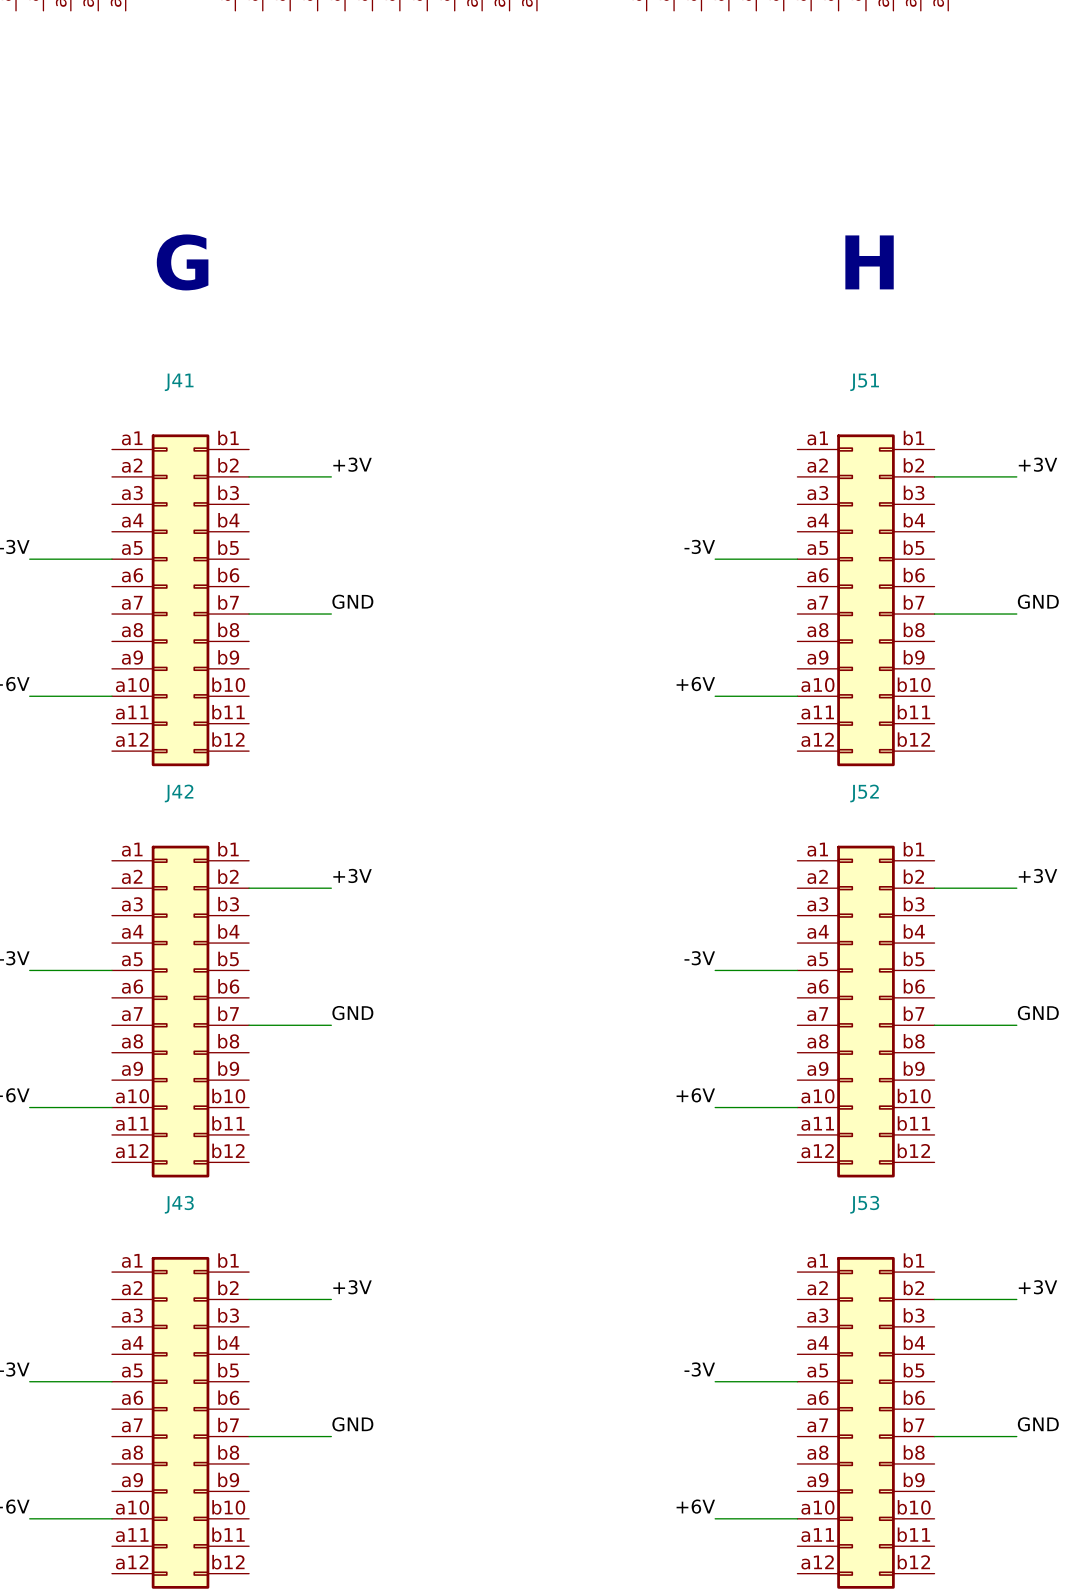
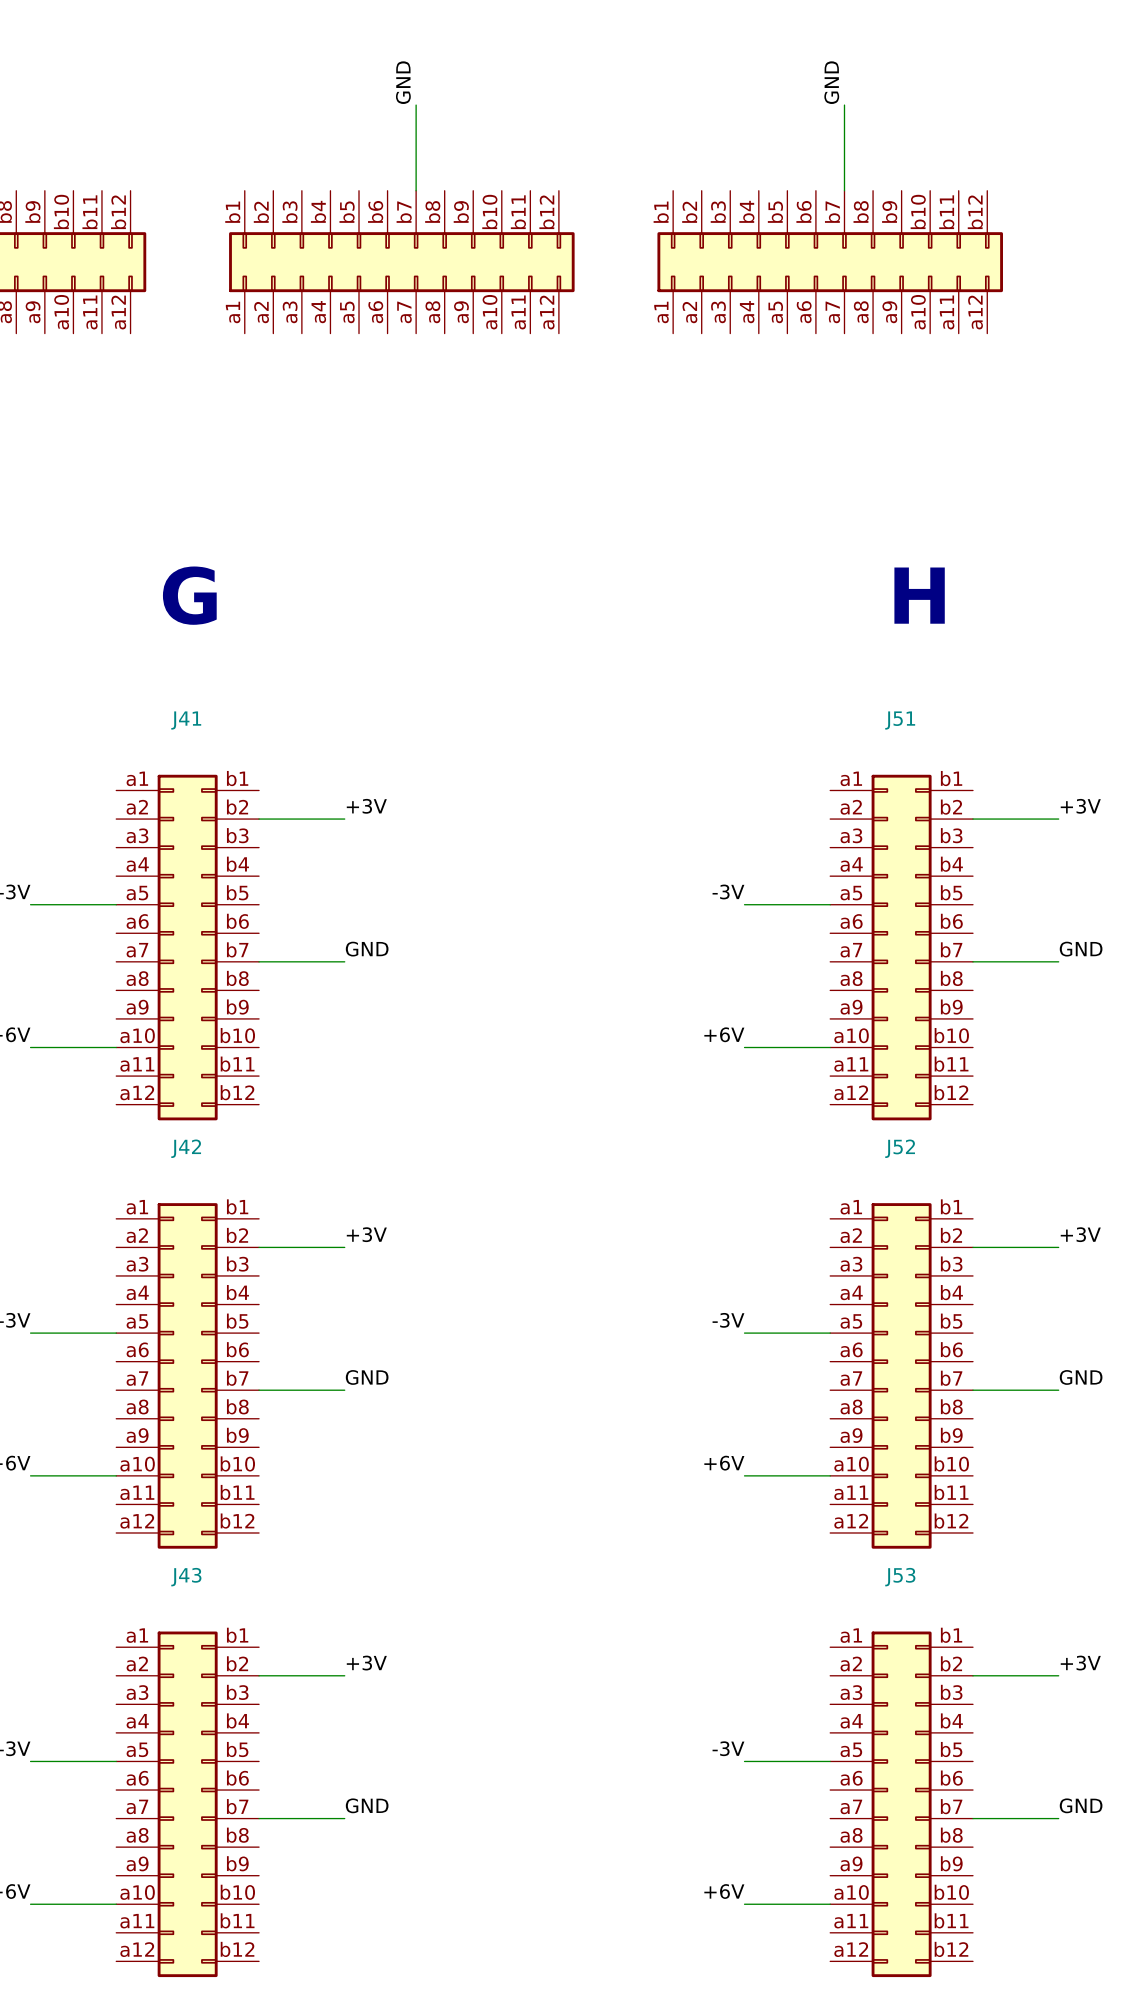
text position: H (869, 262) -> H (919, 595)

